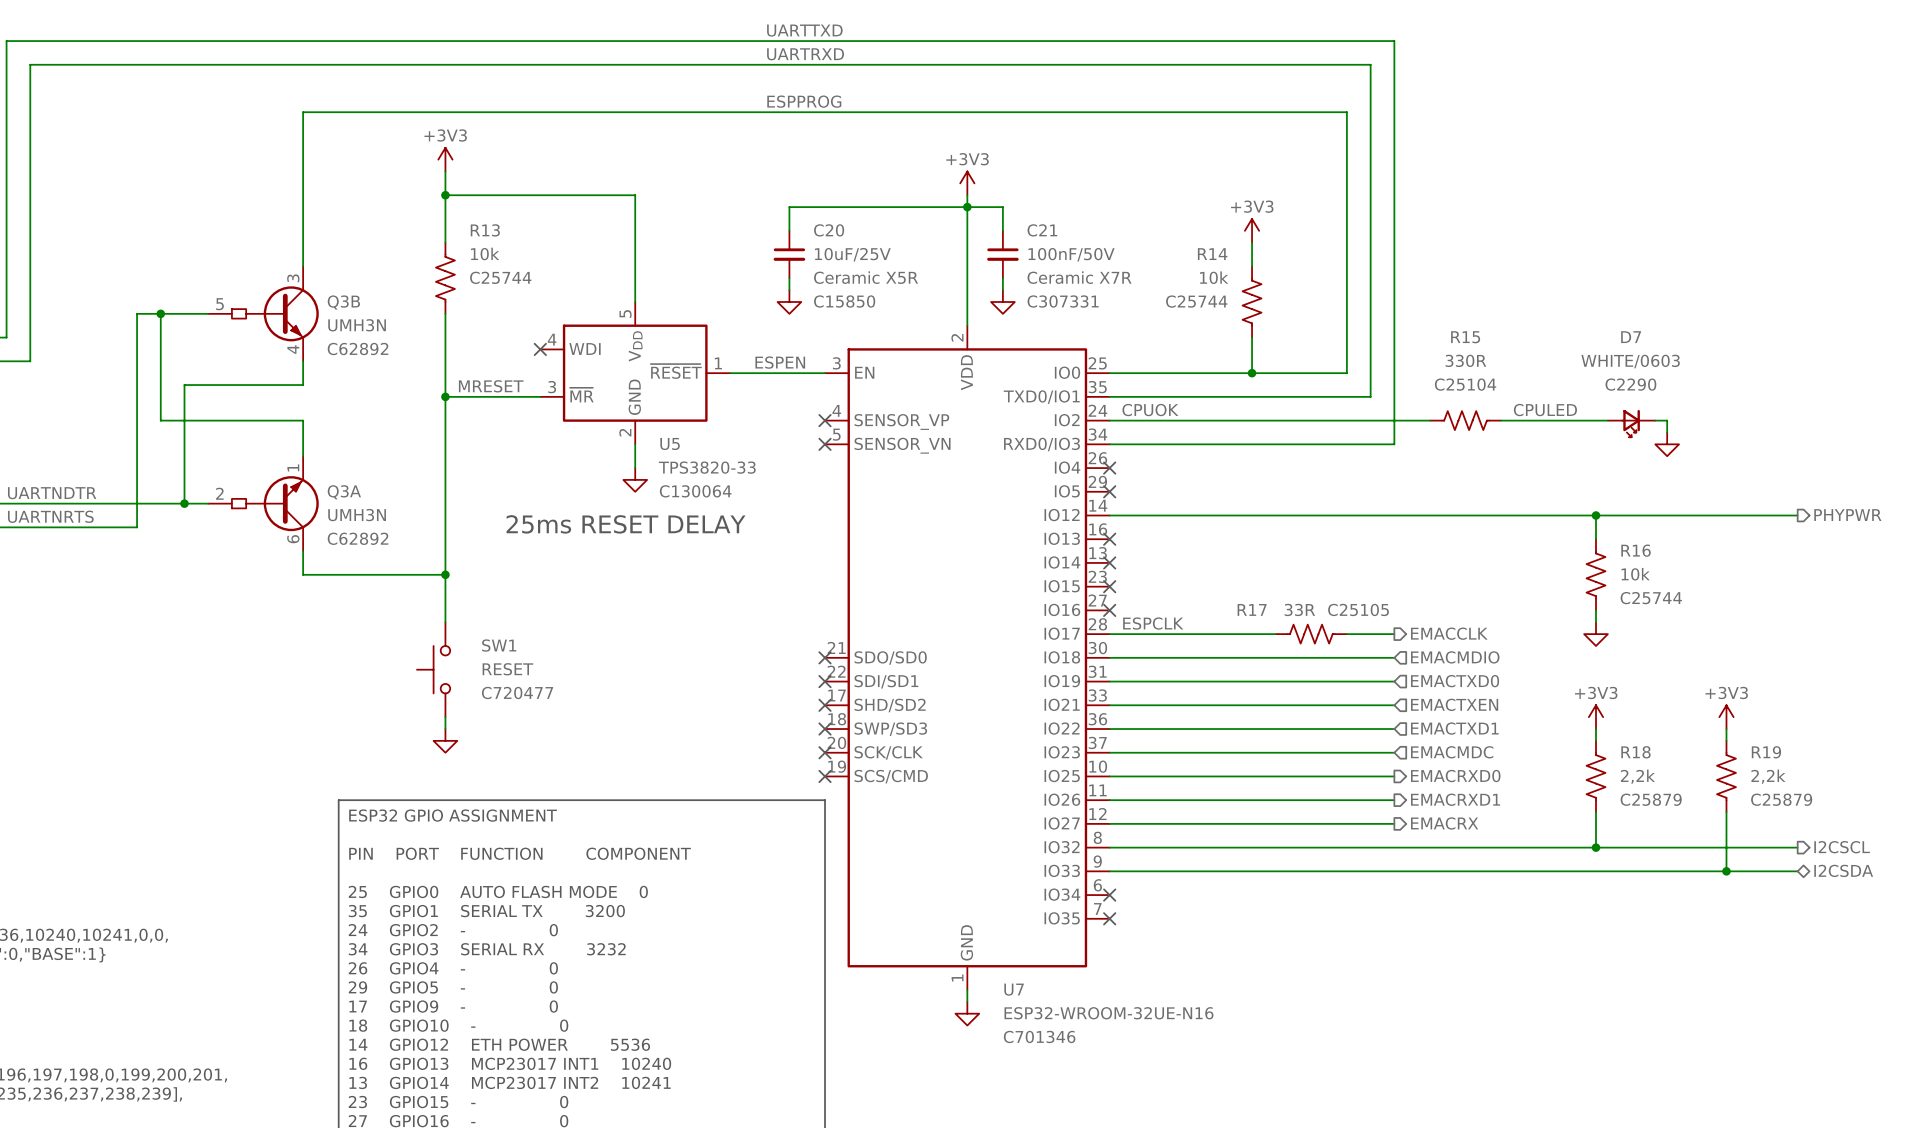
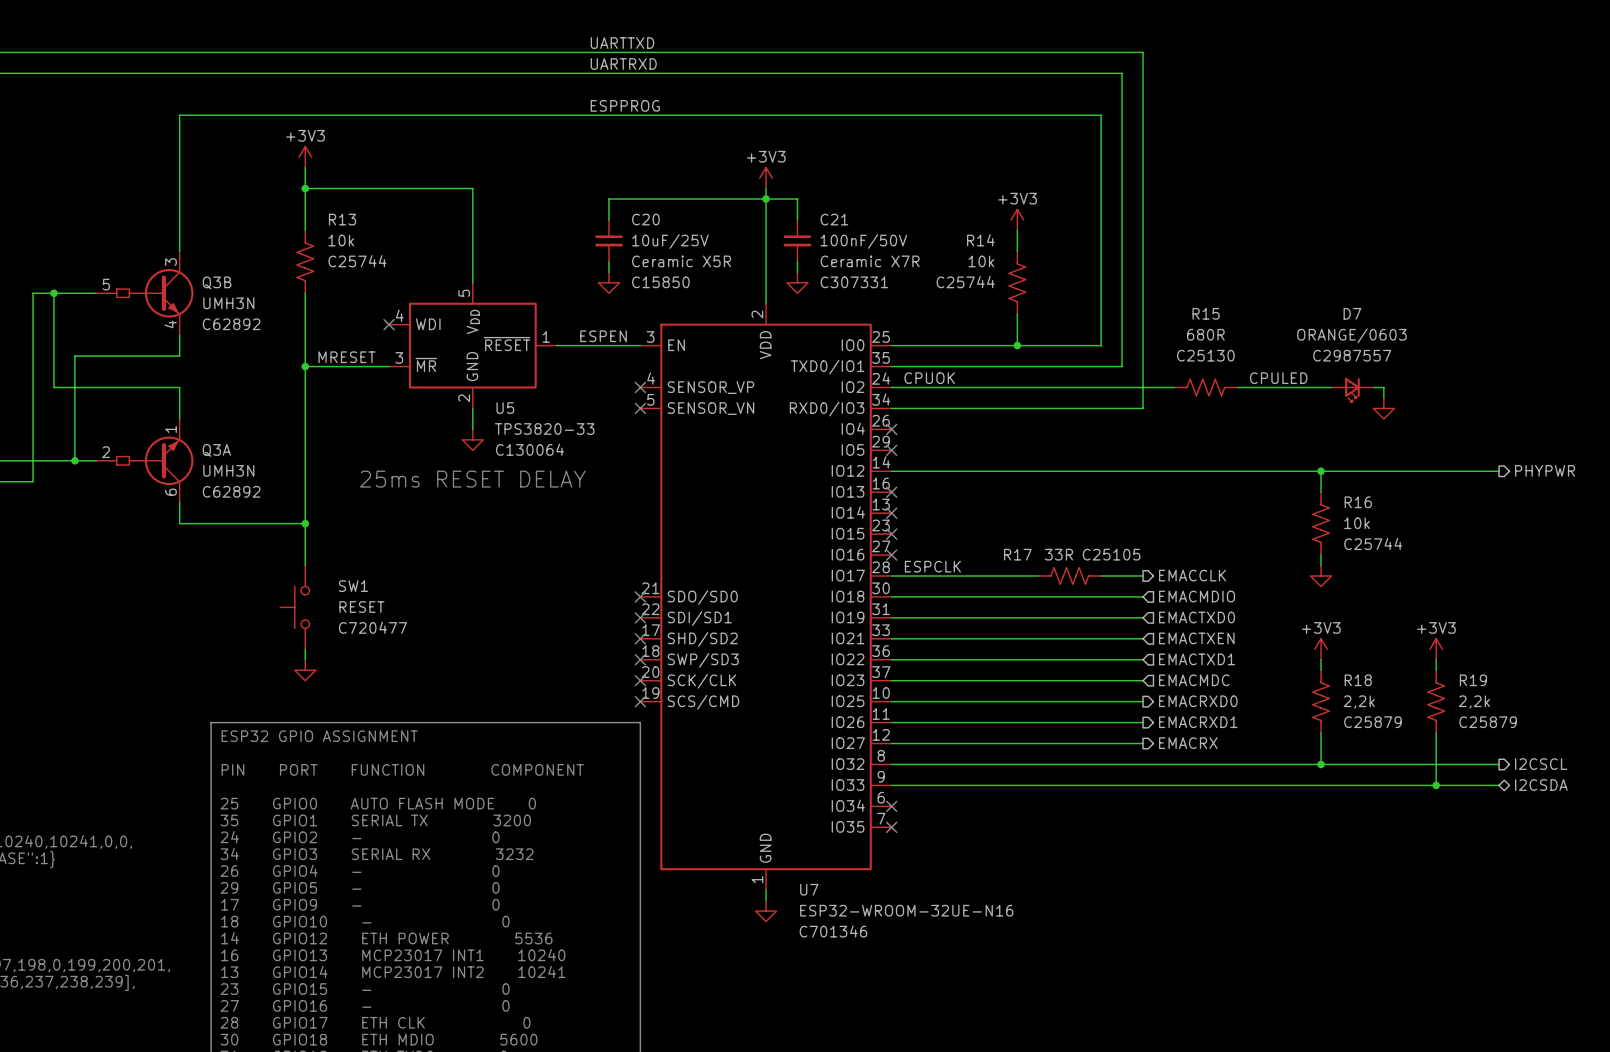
R15 value: 330R (1465, 360) -> 680R (1205, 334)
D7 value: WHITE/0603 (1630, 361) -> ORANGE/0603 (1351, 335)
R15 text: C25104 (1465, 384) -> C25130 (1205, 355)
D7 text: C2290 (1630, 384) -> C2987557 (1352, 355)

